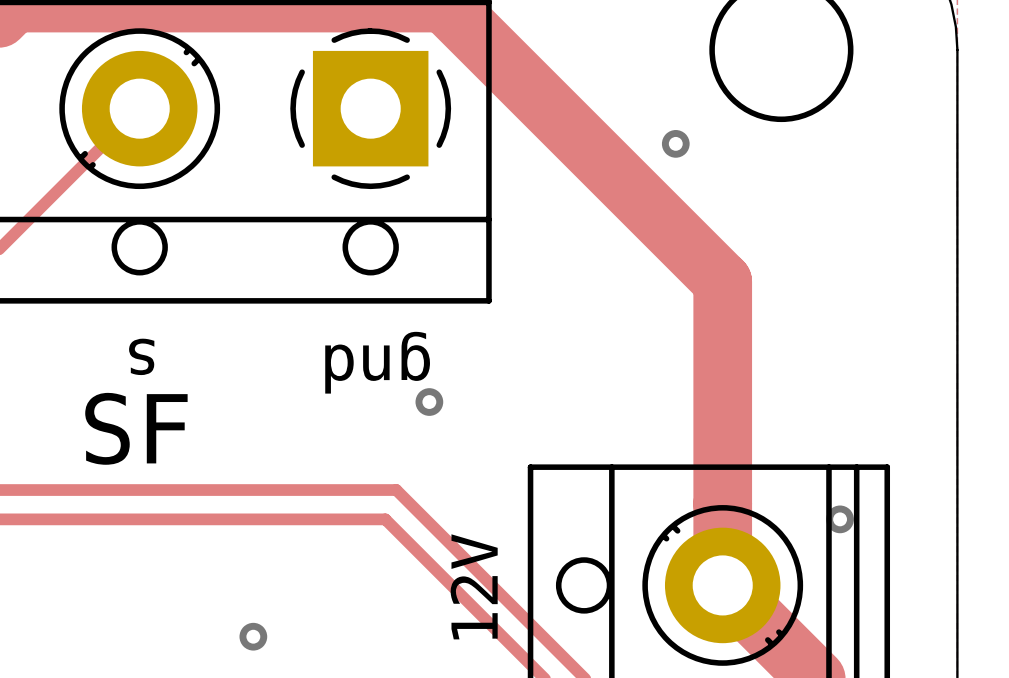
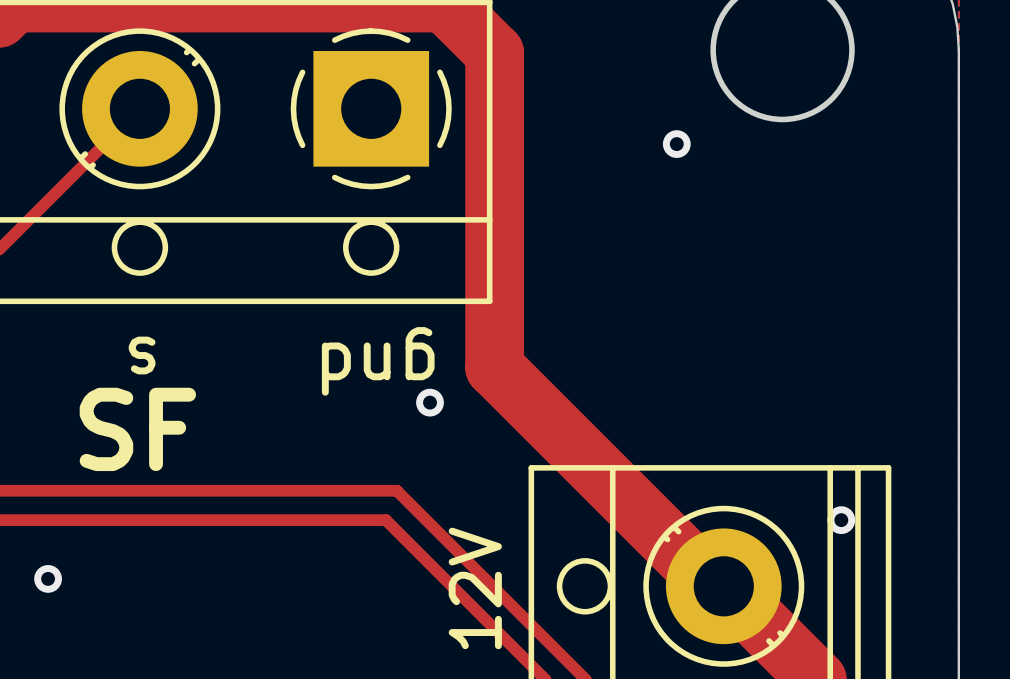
top track: (493, 53) (722, 281) (722, 585) -> (494, 53) (494, 367) (713, 586) (723, 586)
via: none -> (48, 578)
via: (253, 636) -> none

